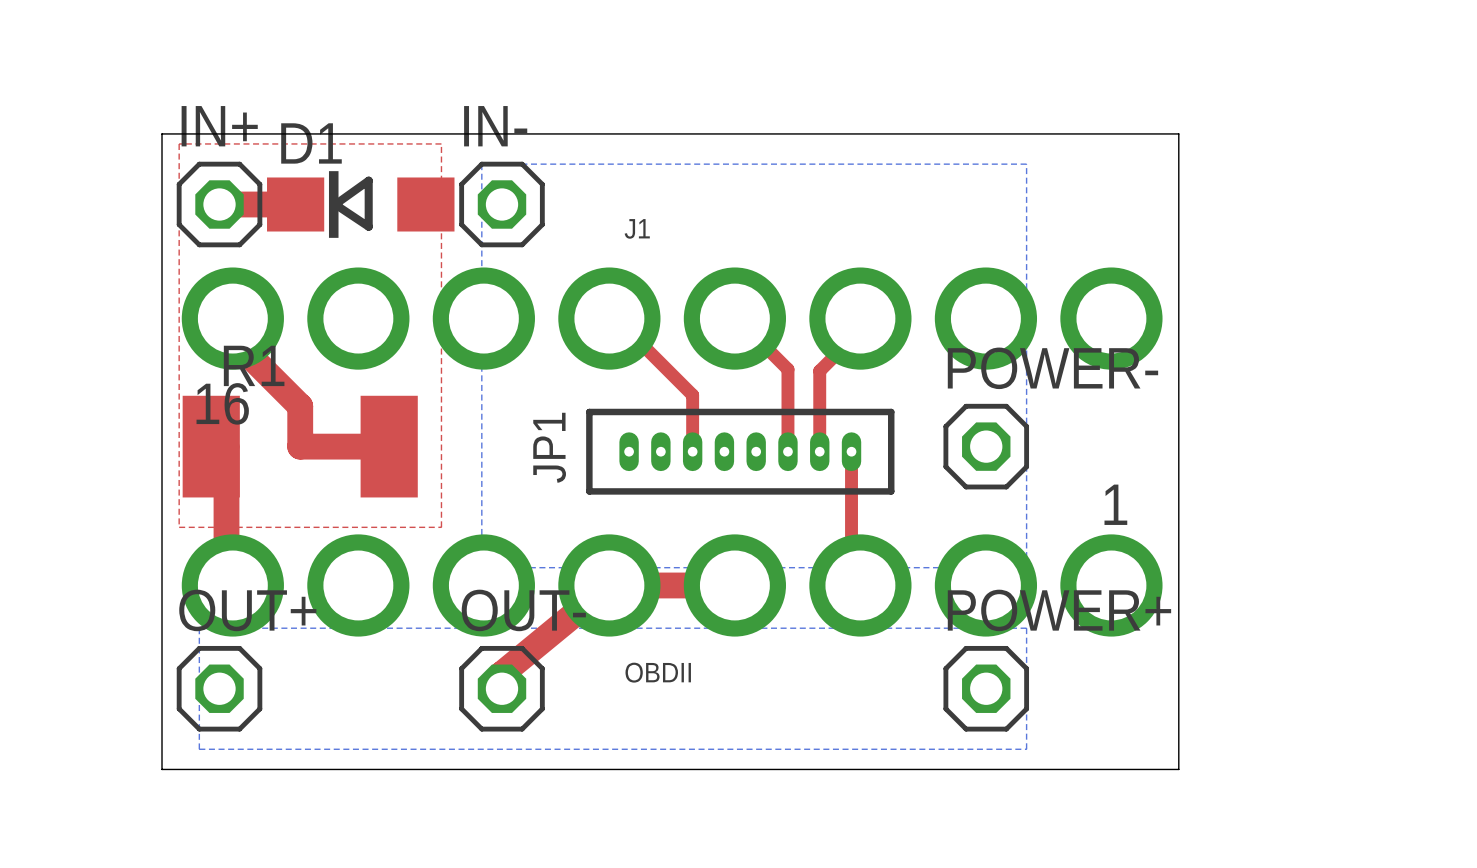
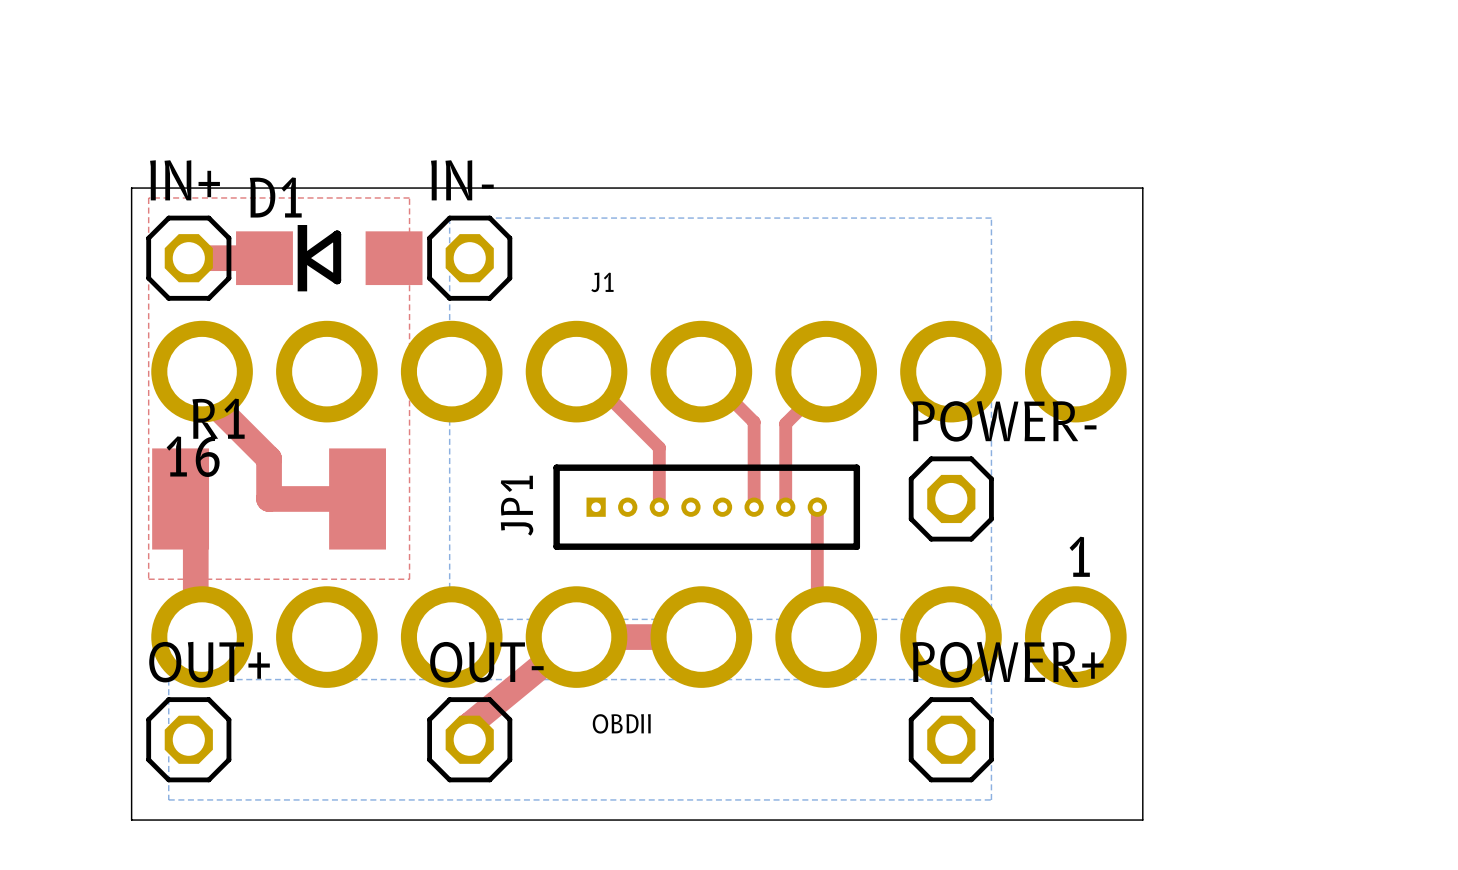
JP1 footprint: [586, 408, 895, 495] -> [553, 464, 861, 550]

